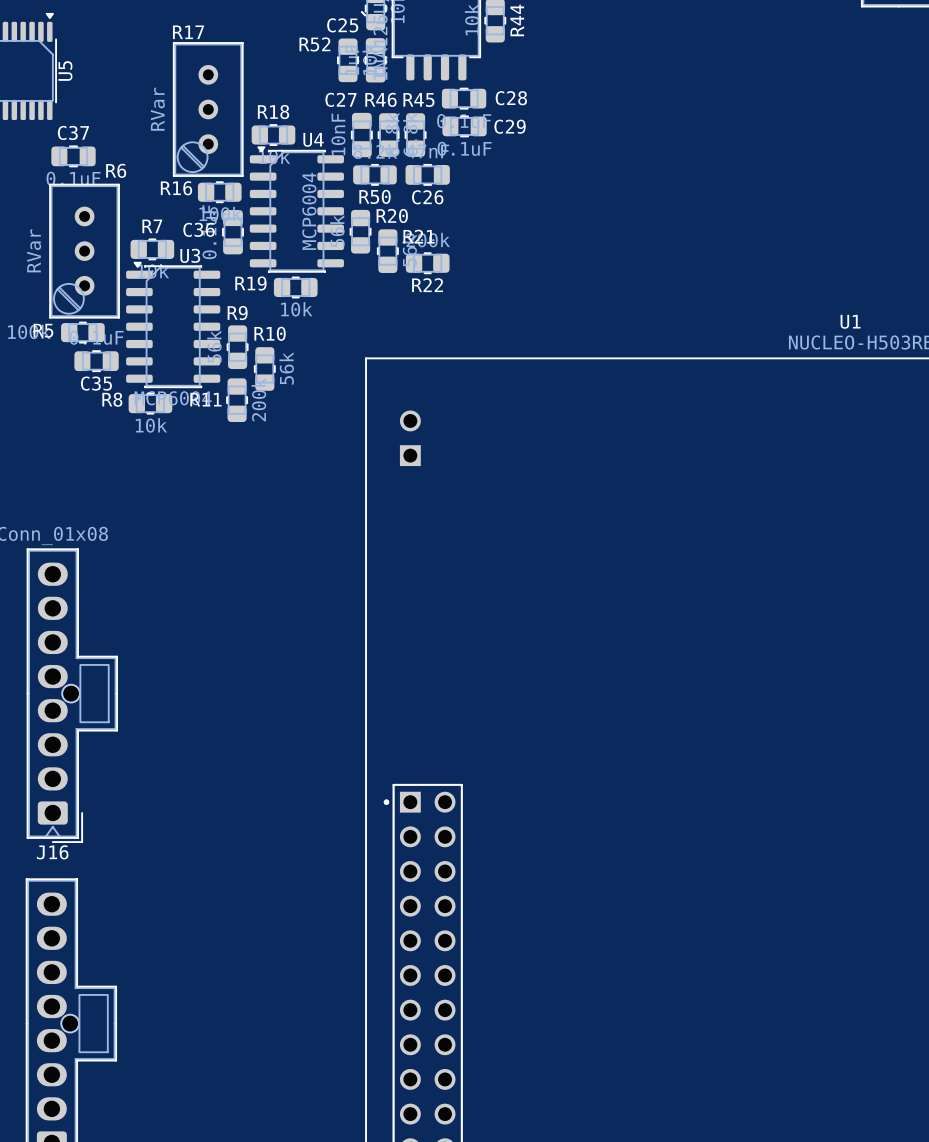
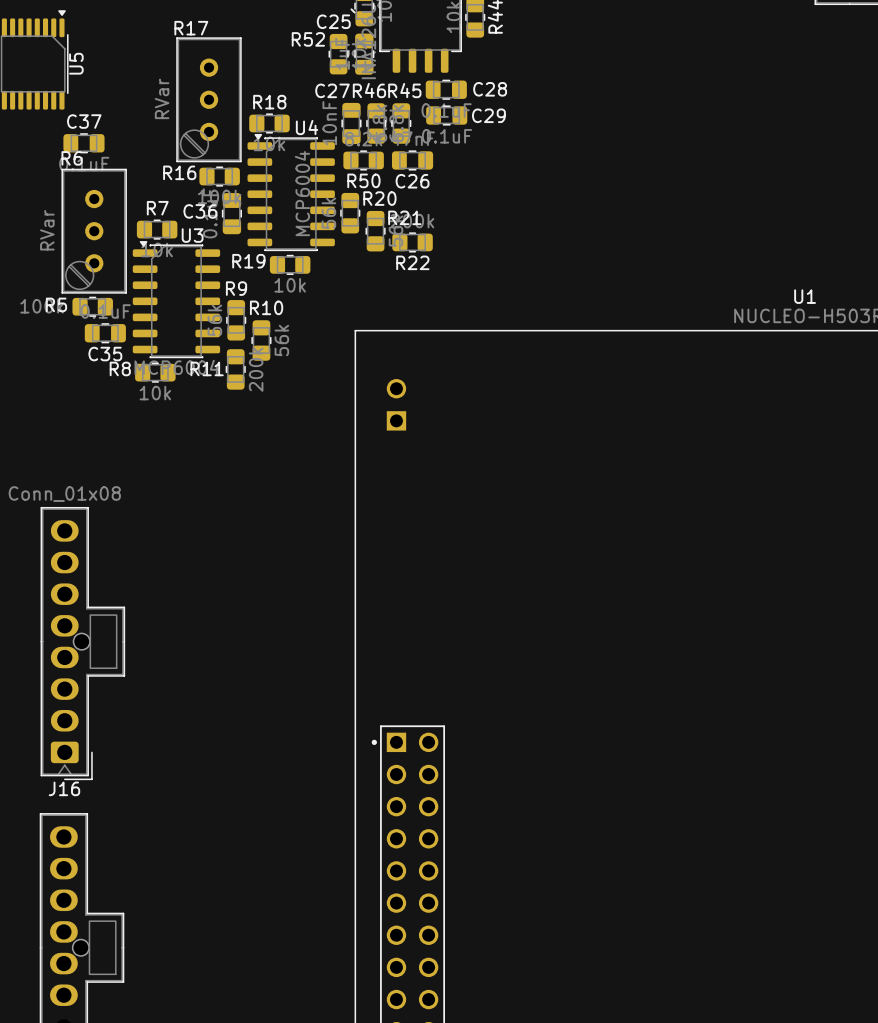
R6 name position: R6 (116, 170) -> R6 (72, 158)

